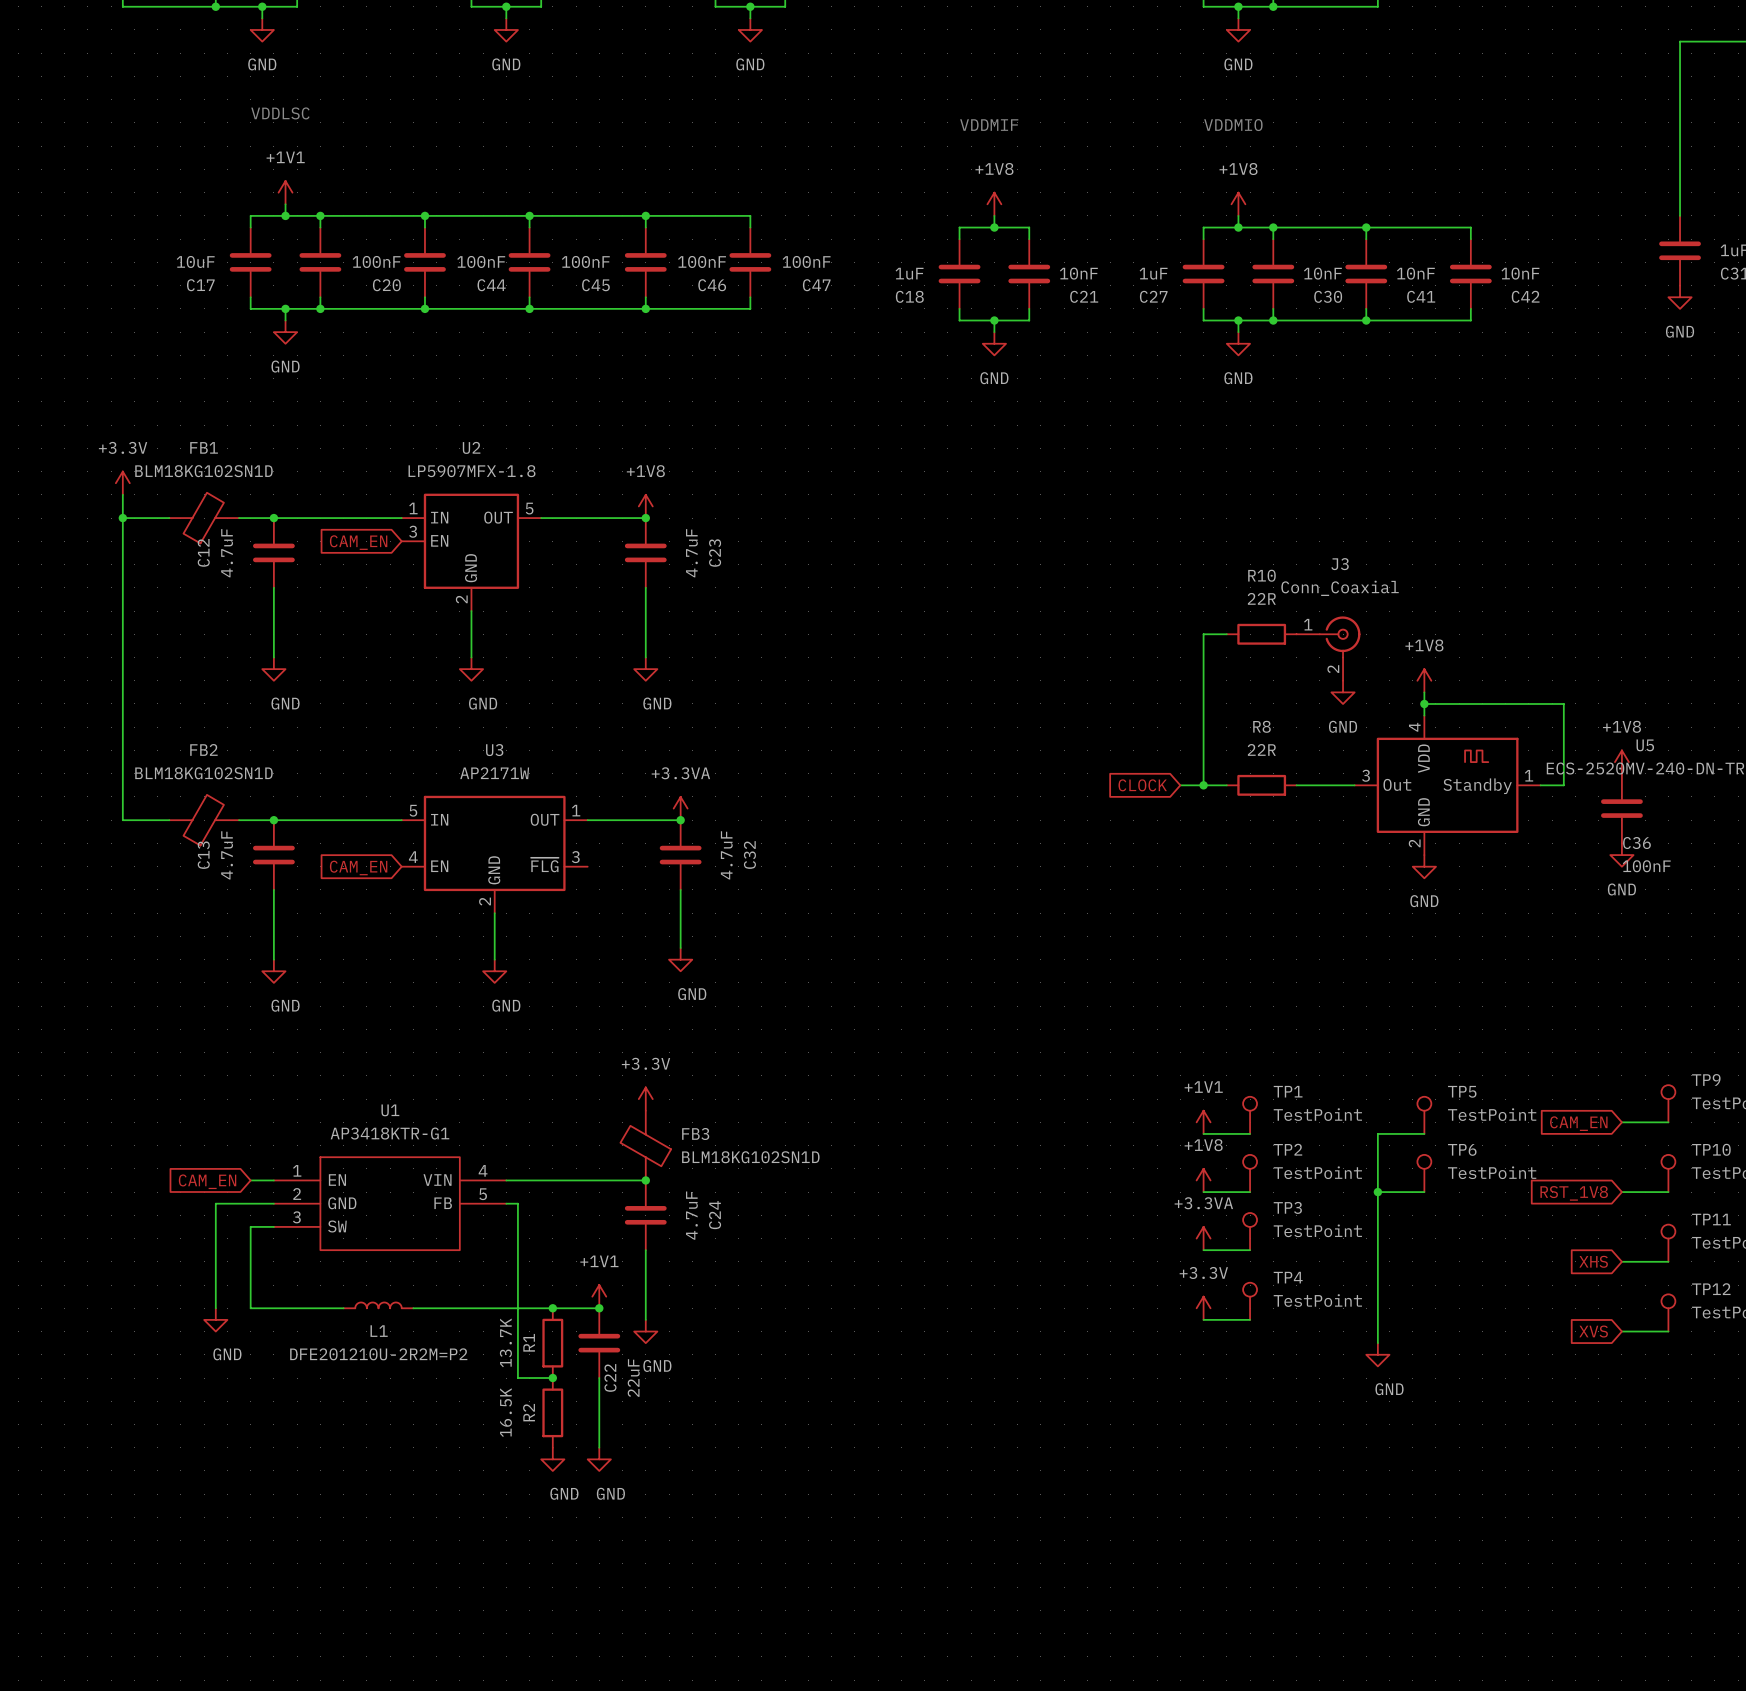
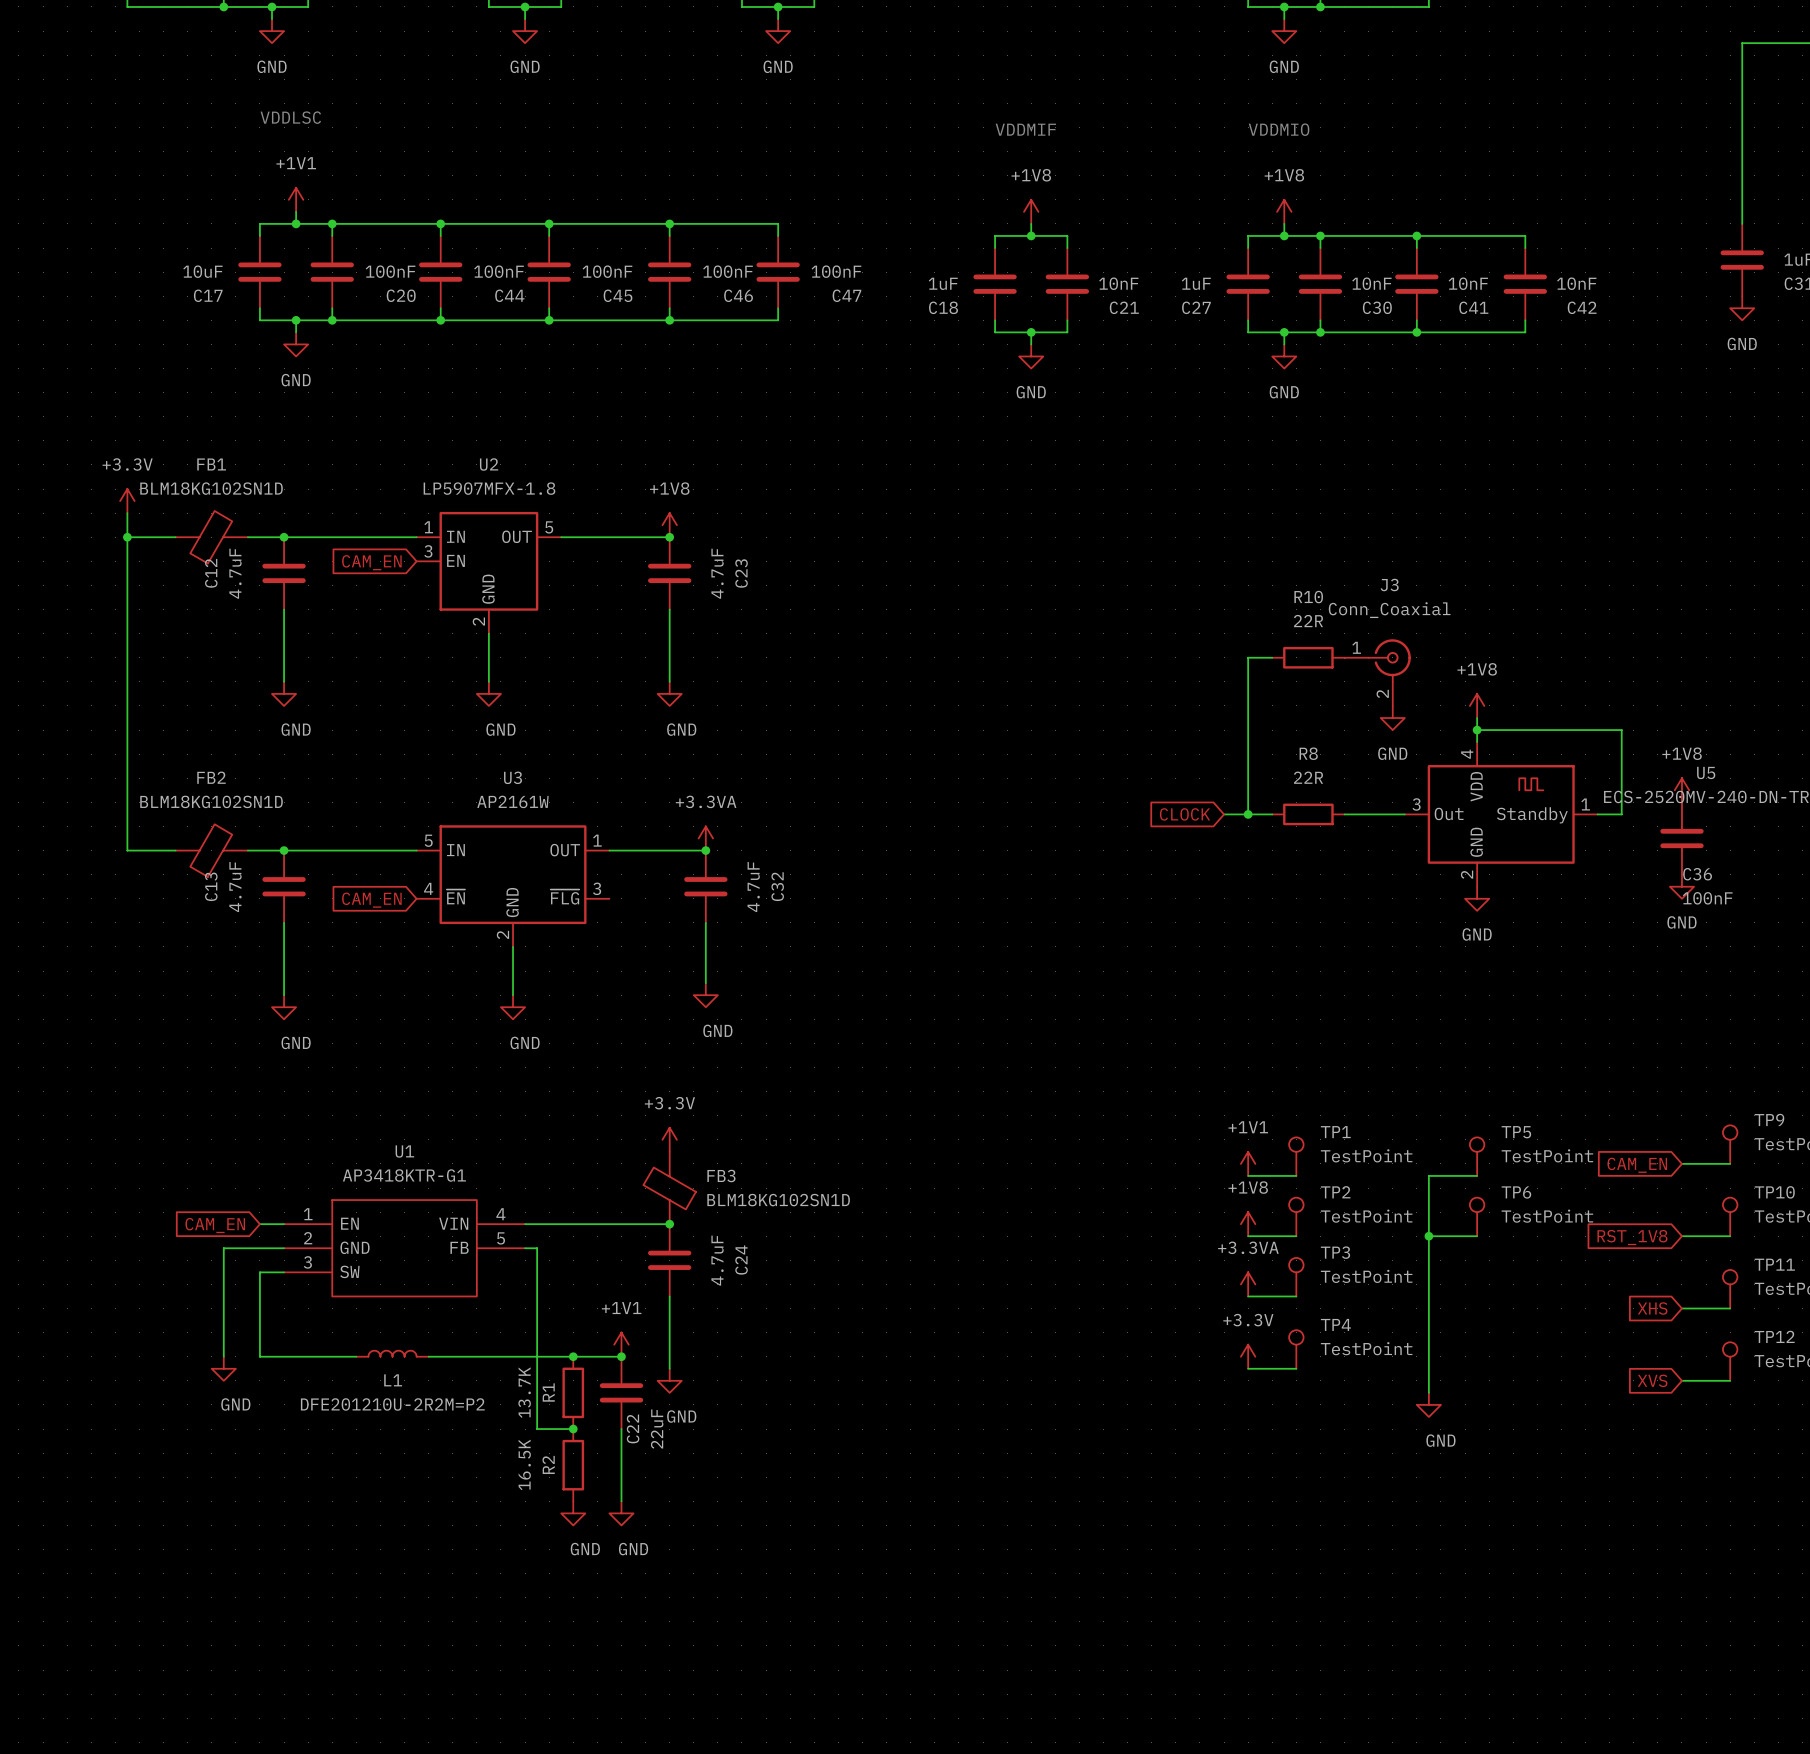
U3 value: AP2171W (494, 773) -> AP2161W (512, 801)
U3 pin name: EN (439, 866) -> ~{EN} (455, 896)

